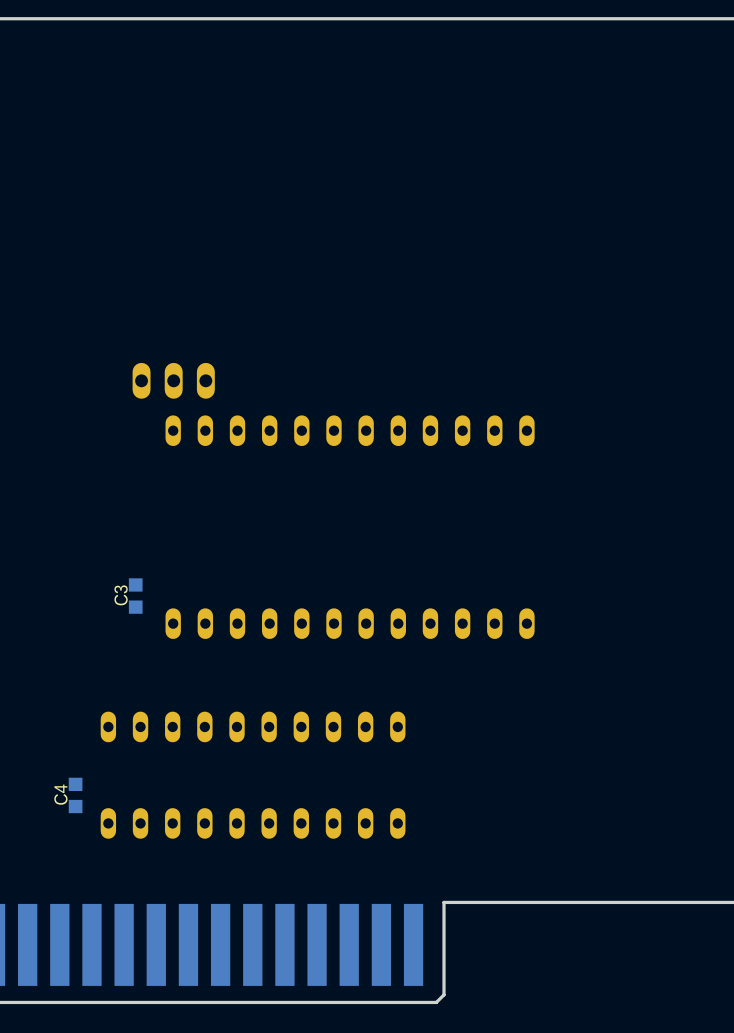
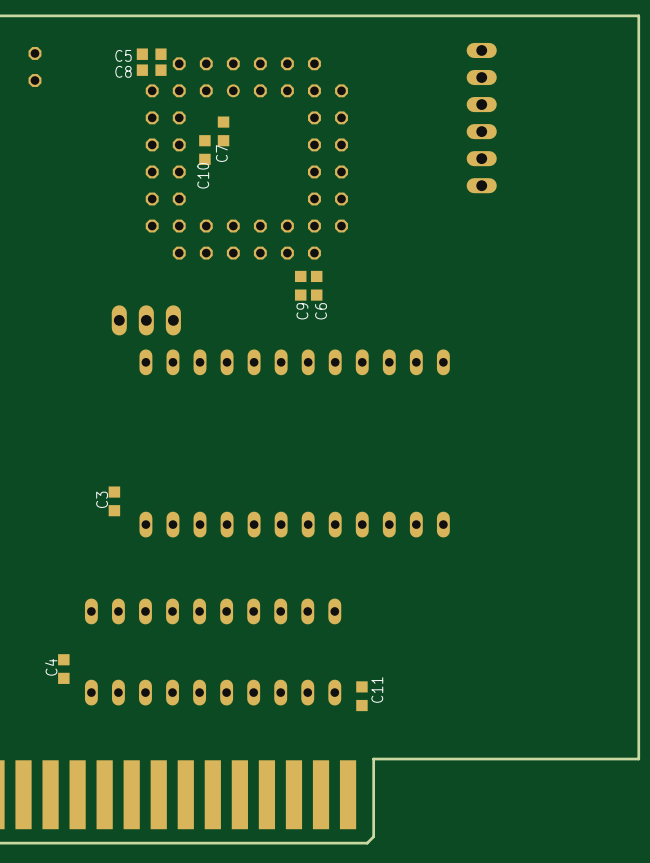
C5: none -> (151, 54)
part: none -> (34, 66)
C8: none -> (151, 70)
part: none -> (481, 118)
C7: none -> (223, 131)
C10: none -> (204, 150)
part: none -> (246, 158)
C9: none -> (300, 285)
C6: none -> (316, 285)
C11: none -> (361, 696)

